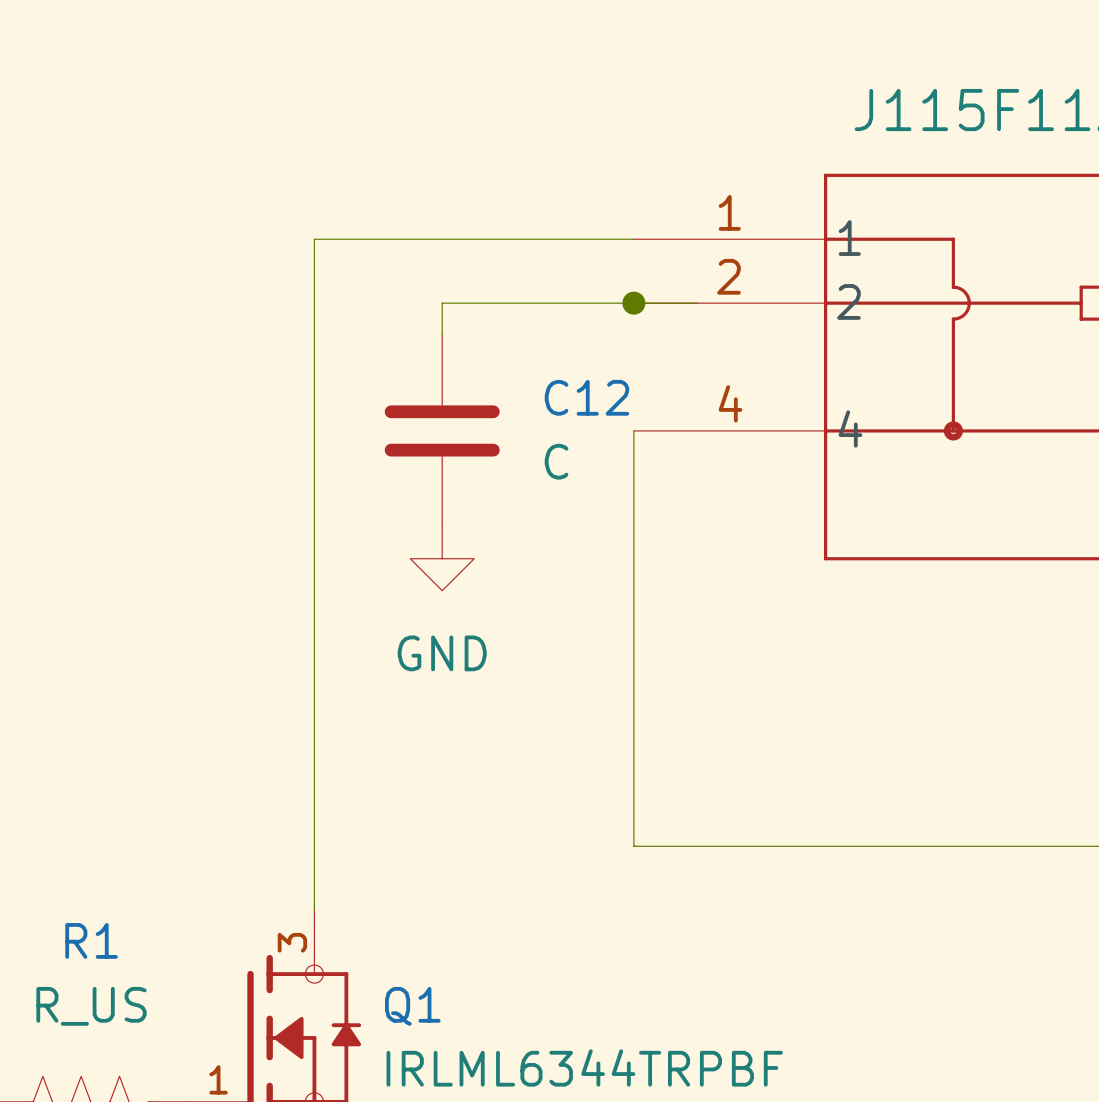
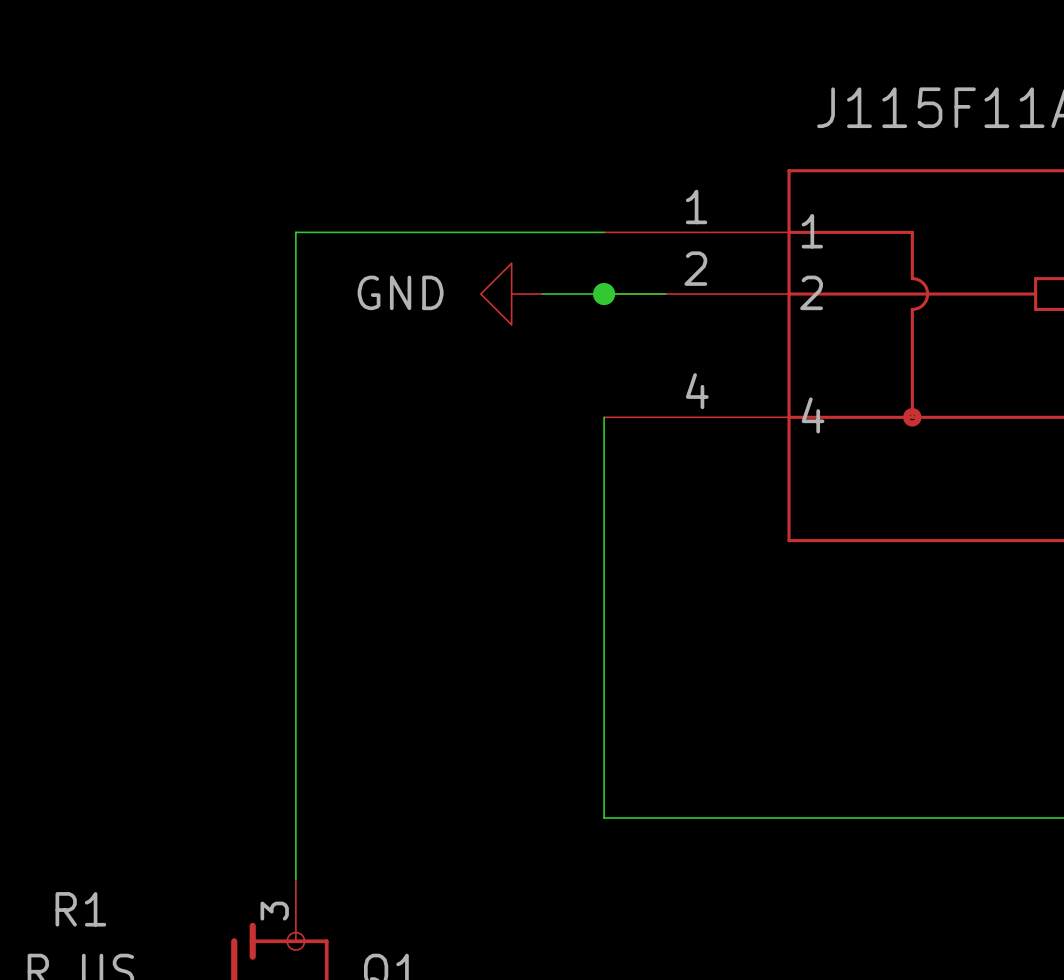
wire: (570, 303) (442, 303) (442, 335) -> none
C12: C (442, 430) -> none
power symbol rotation: 0° (442, 558) -> 90° clockwise (511, 294)
power symbol position: GND (442, 558) -> GND (511, 294)

